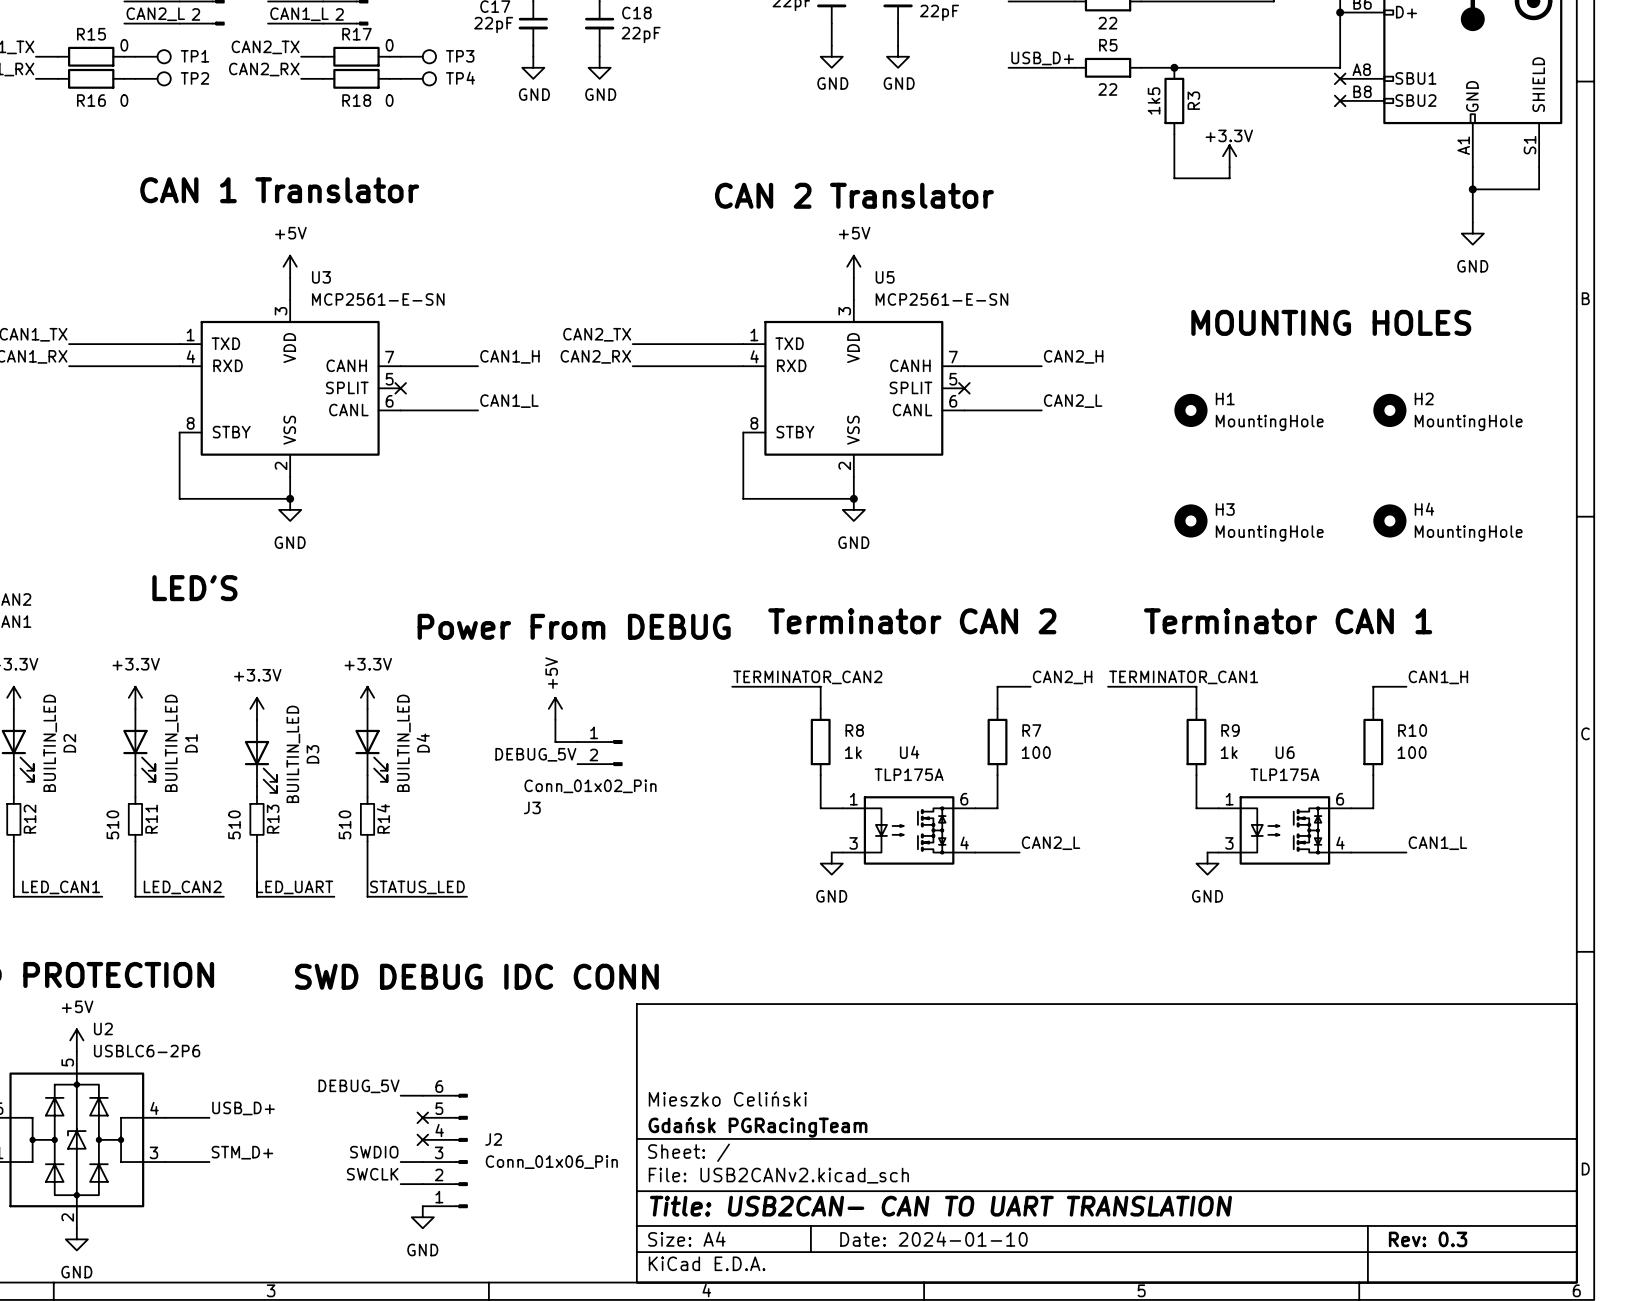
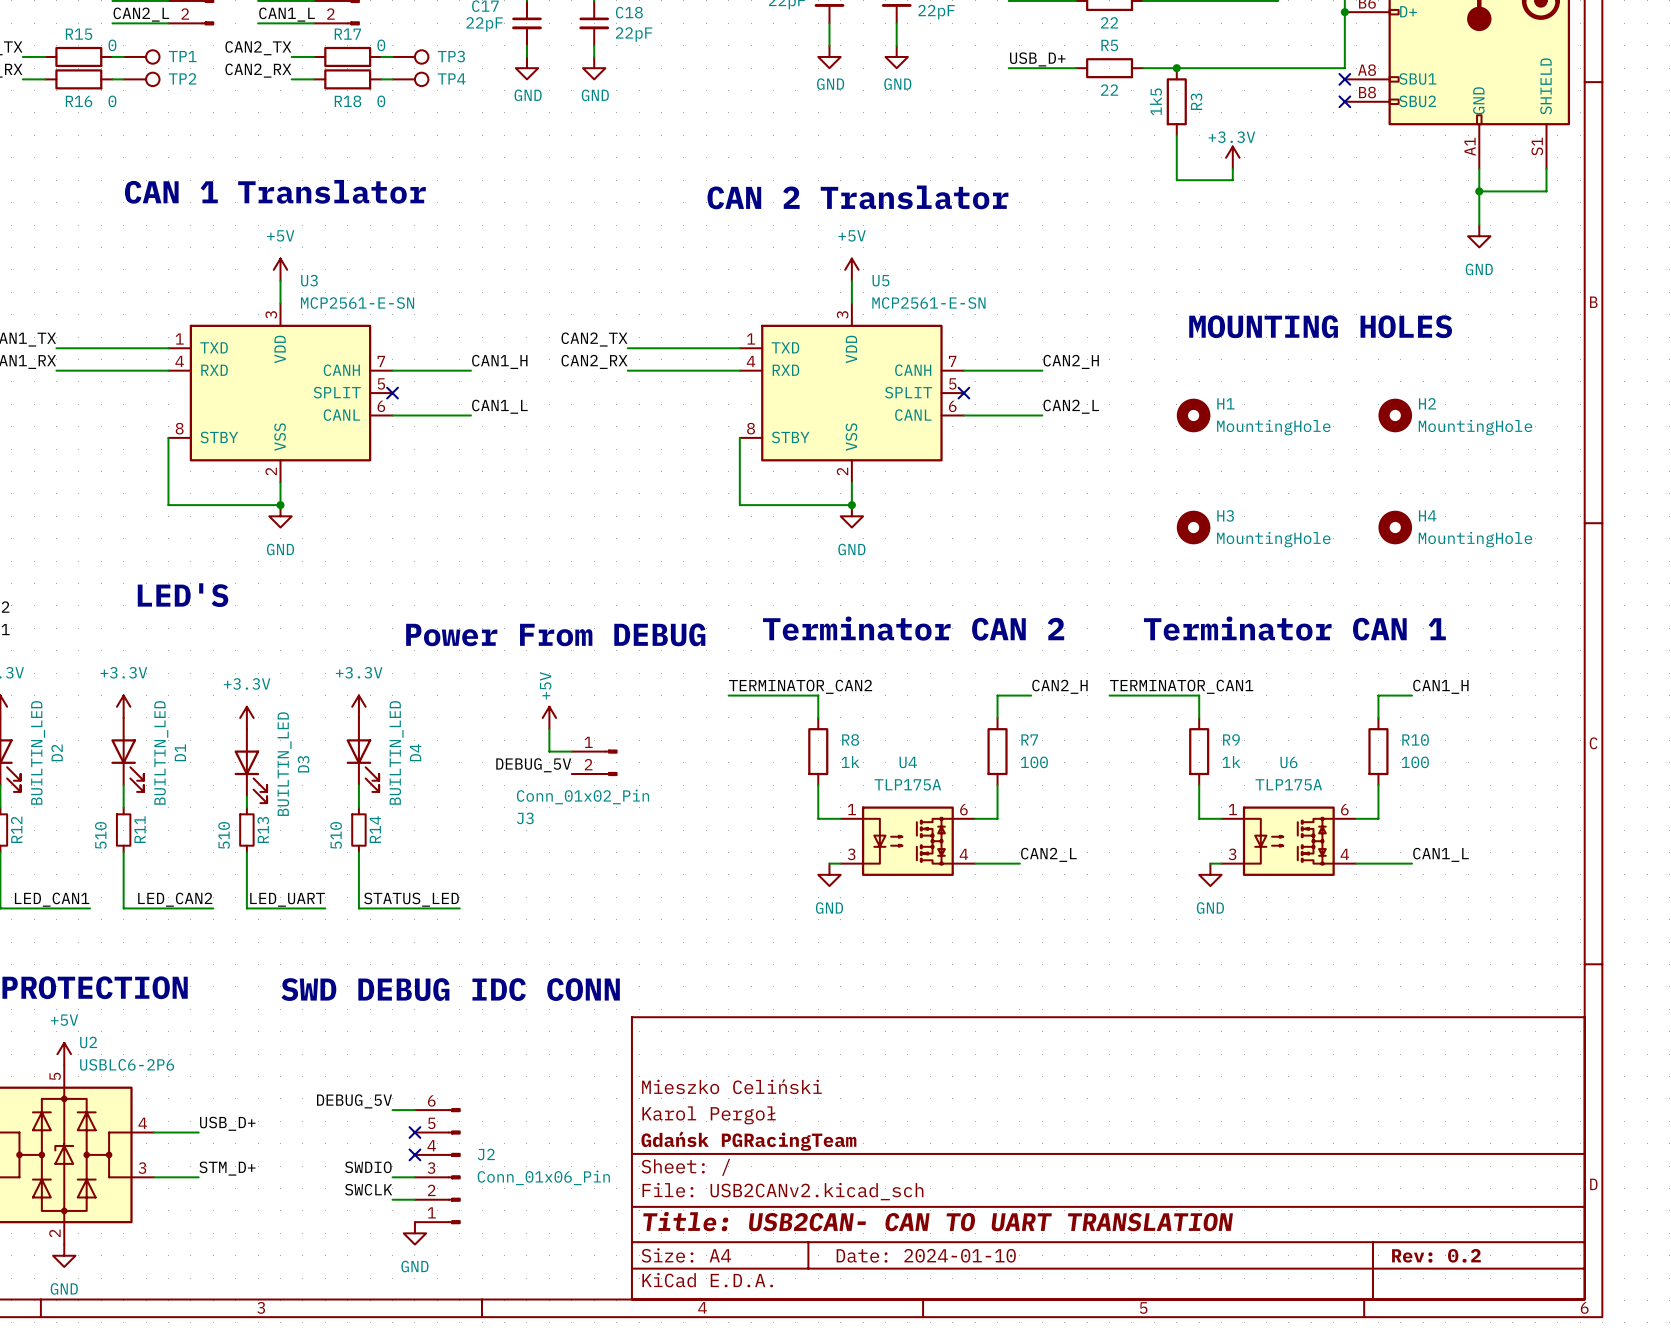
title block: none -> Mieszko Celiński (731, 1086)
title block: Mieszko Celiński (727, 1098) -> Karol Pergoł (709, 1115)
title block: Rev: 0.3 (1428, 1239) -> Rev: 0.2 (1436, 1255)

